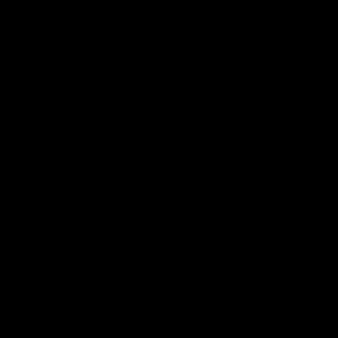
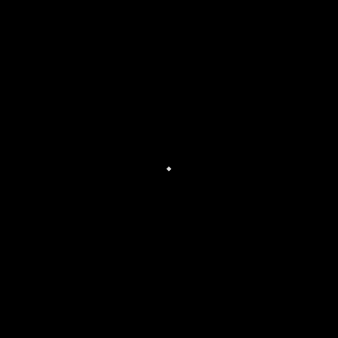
drawing: none -> [166, 166, 172, 172]

